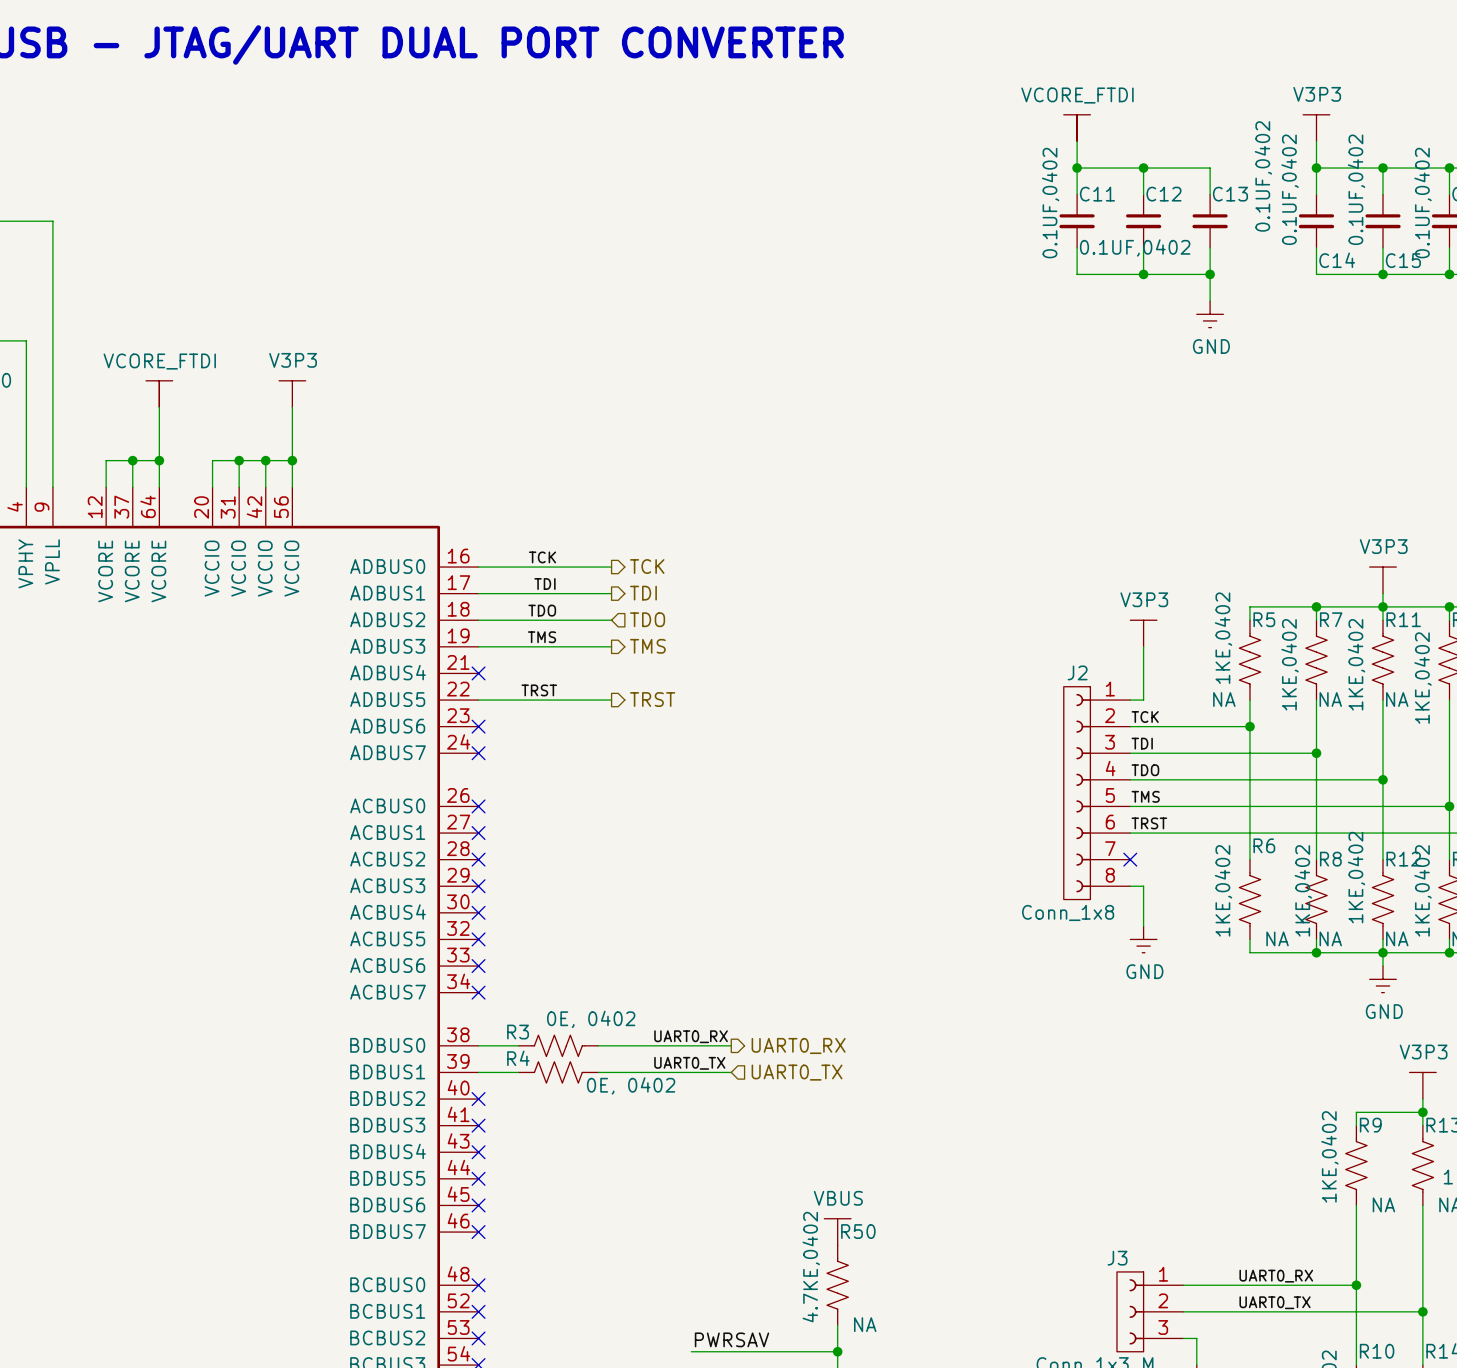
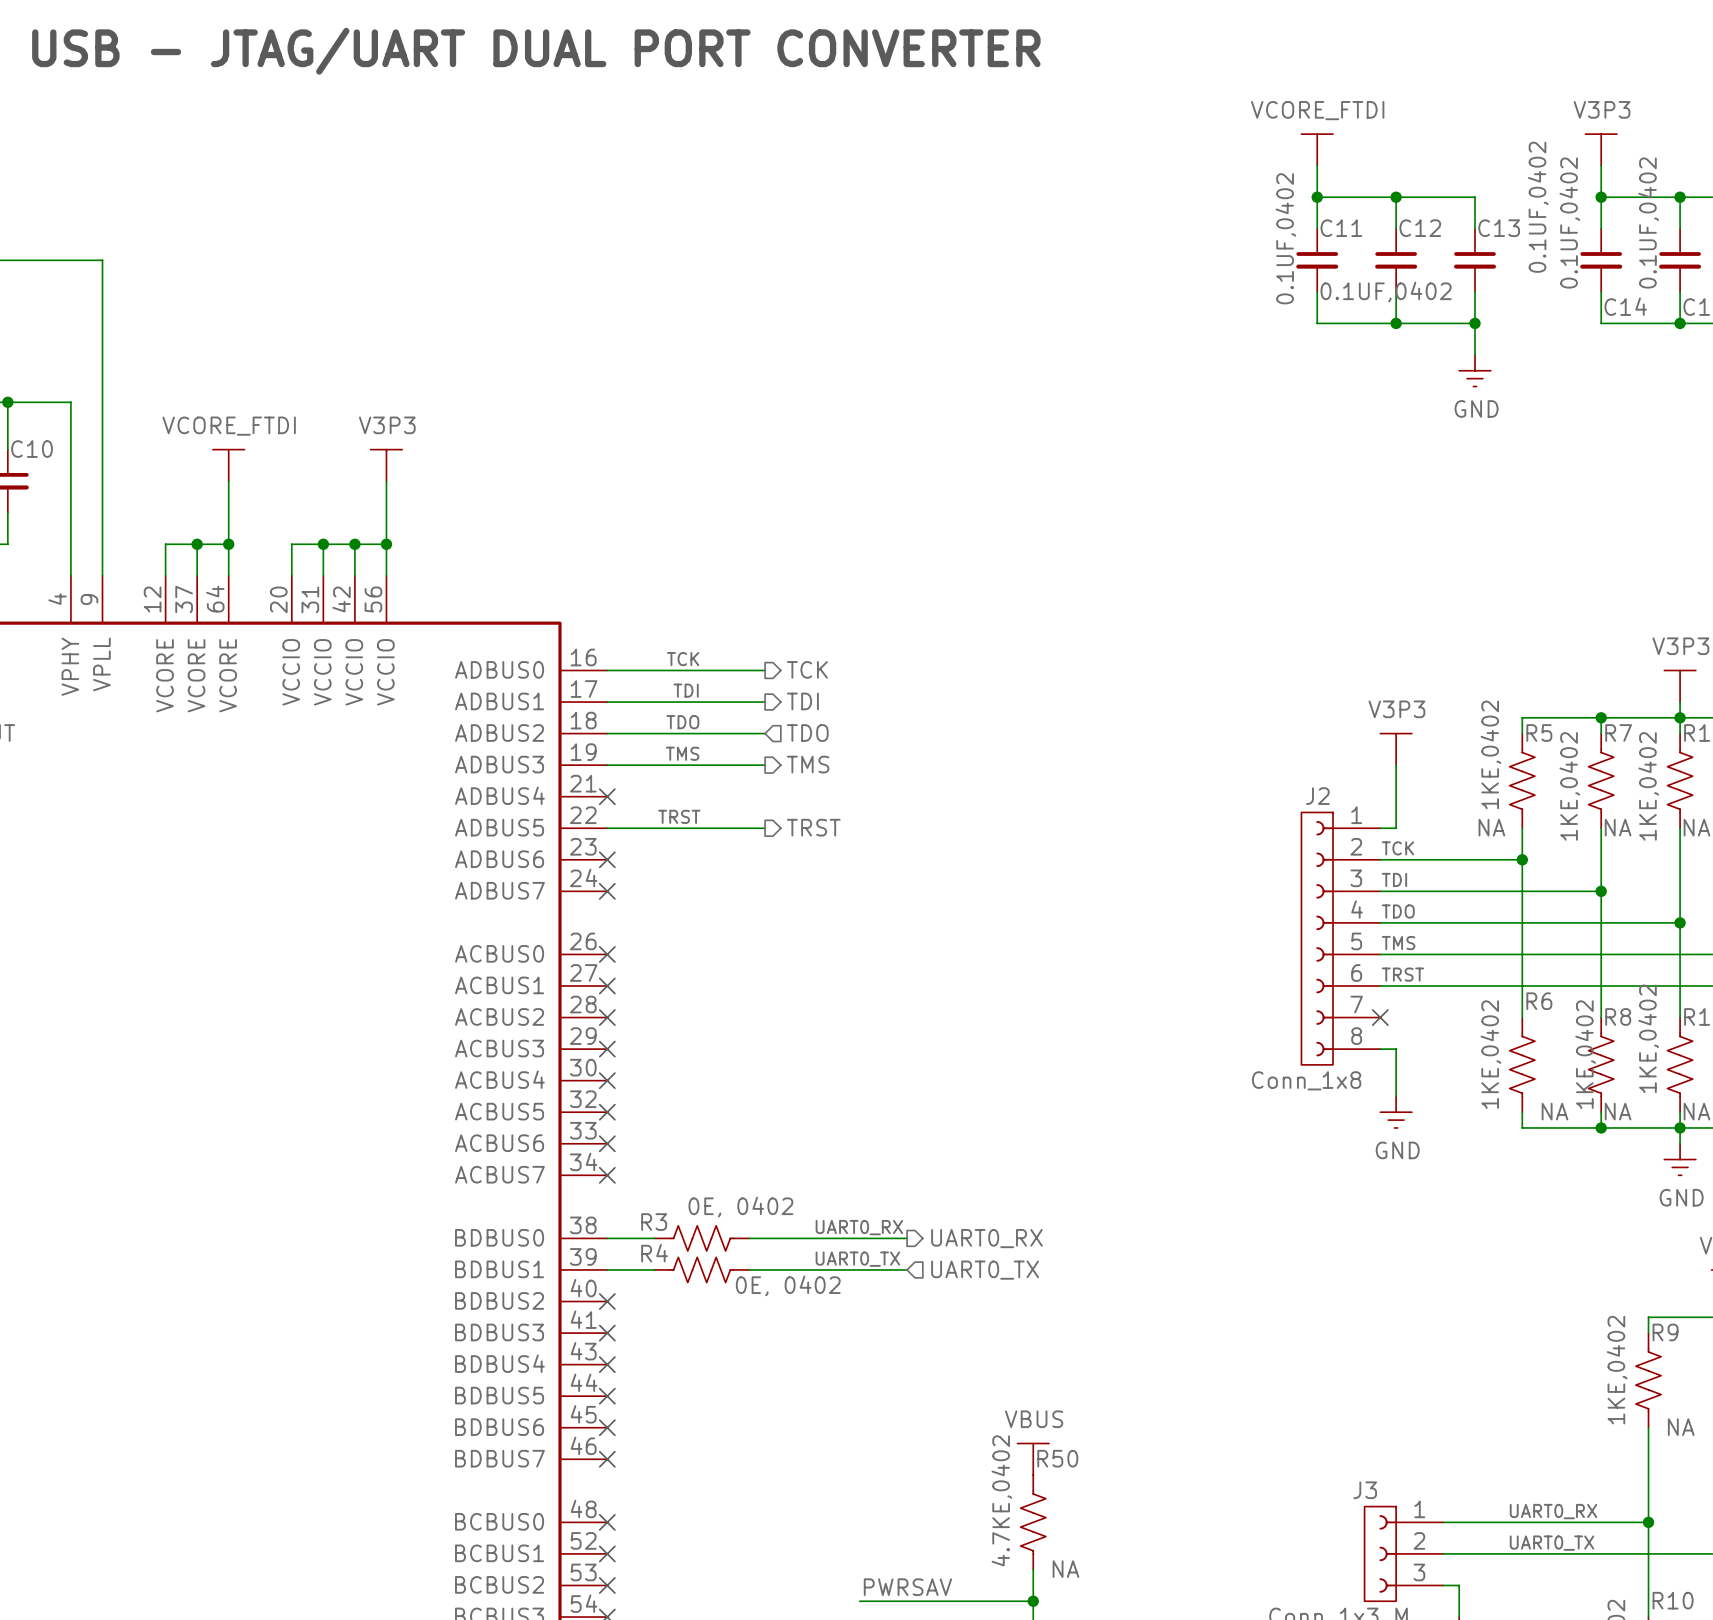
power symbol shape: [1063, 114, 1091, 142] -> [1301, 134, 1334, 166]
power symbol shape: [146, 380, 173, 408] -> [212, 449, 245, 482]

